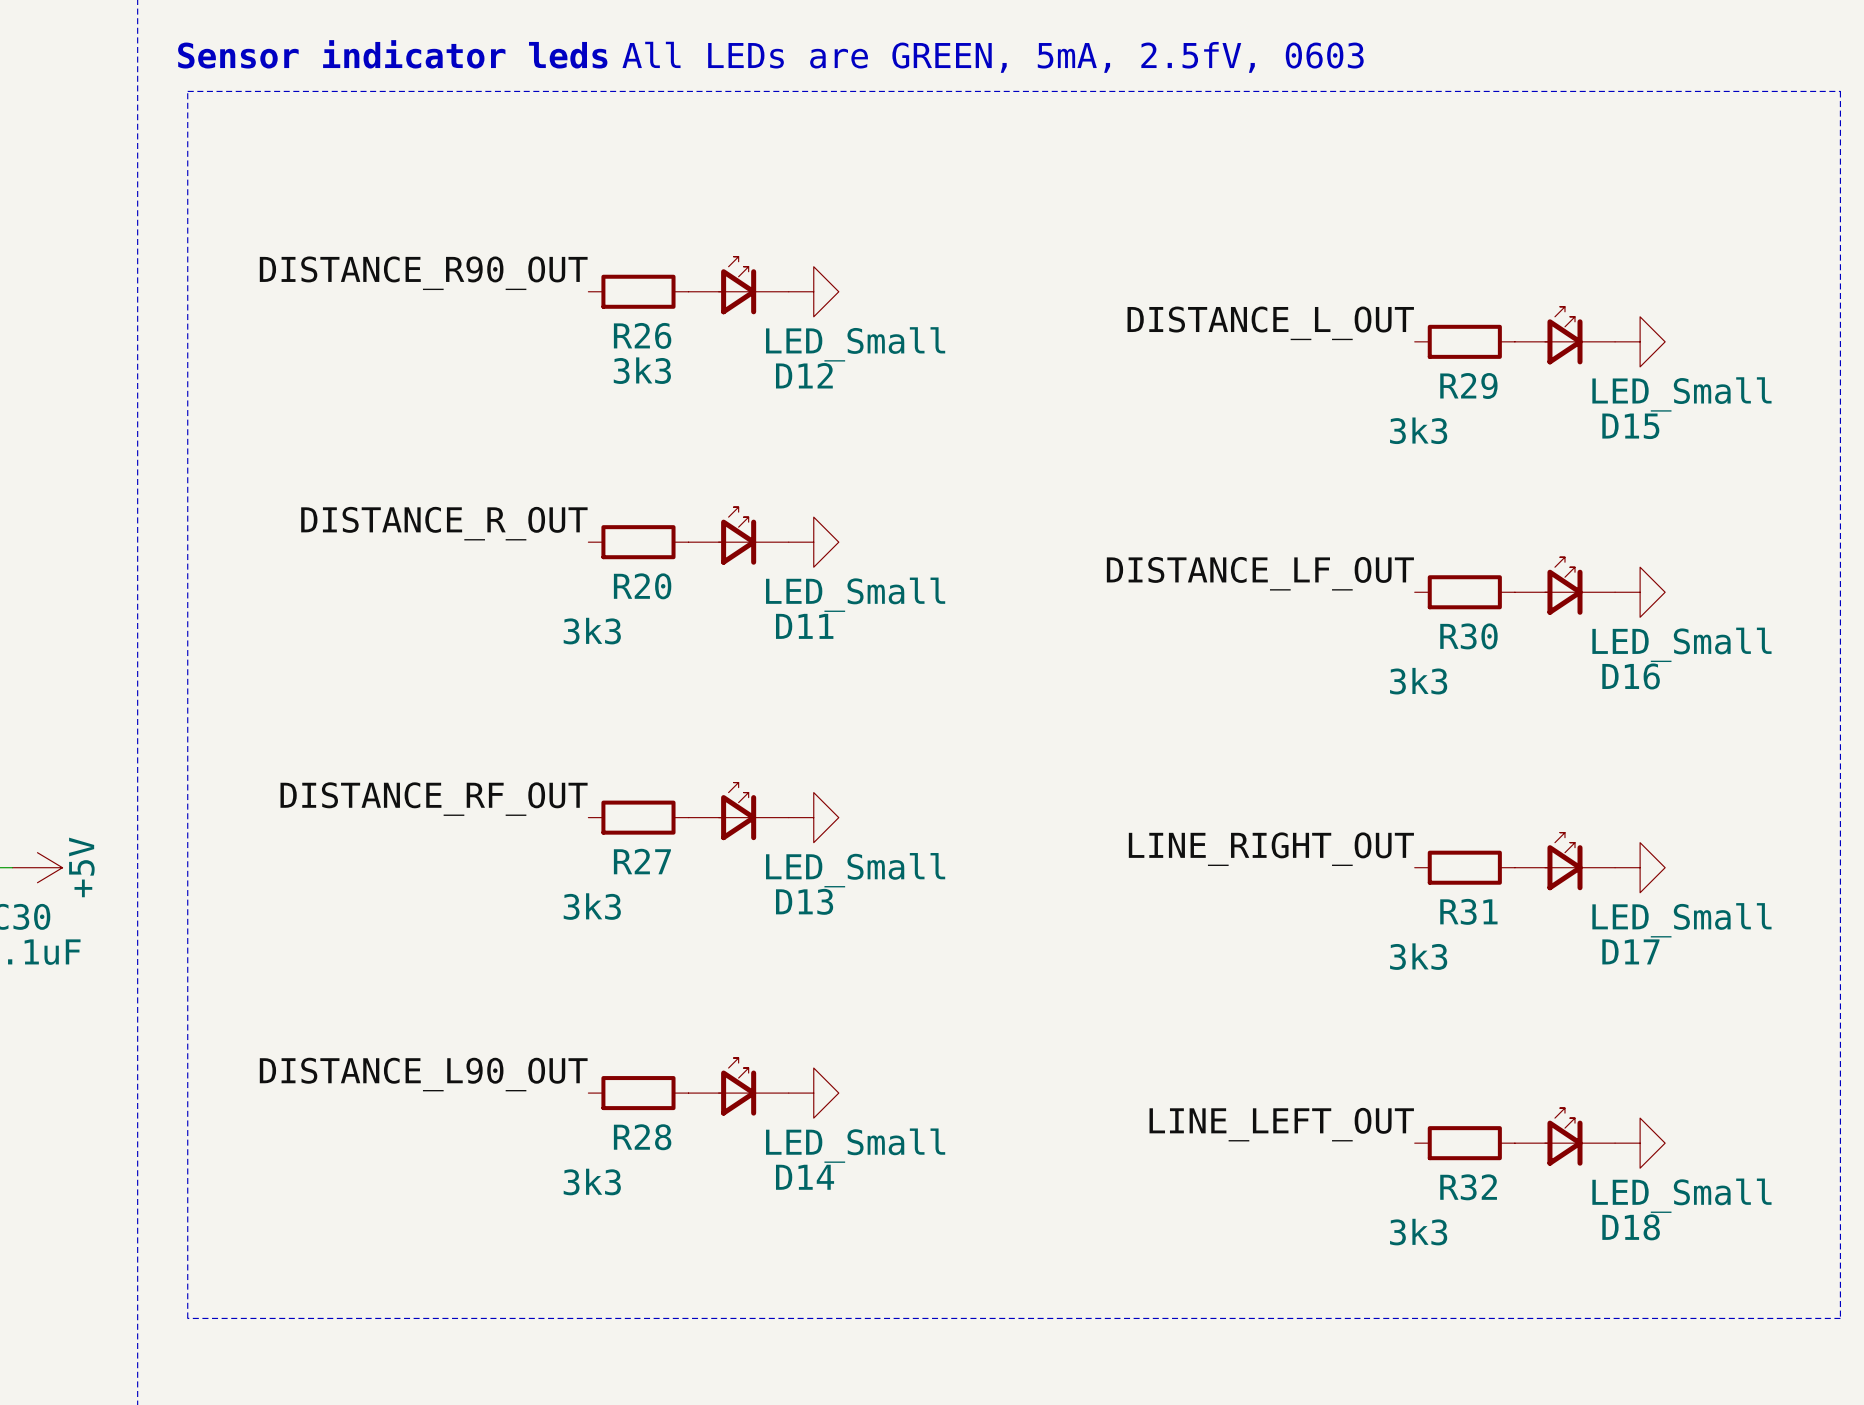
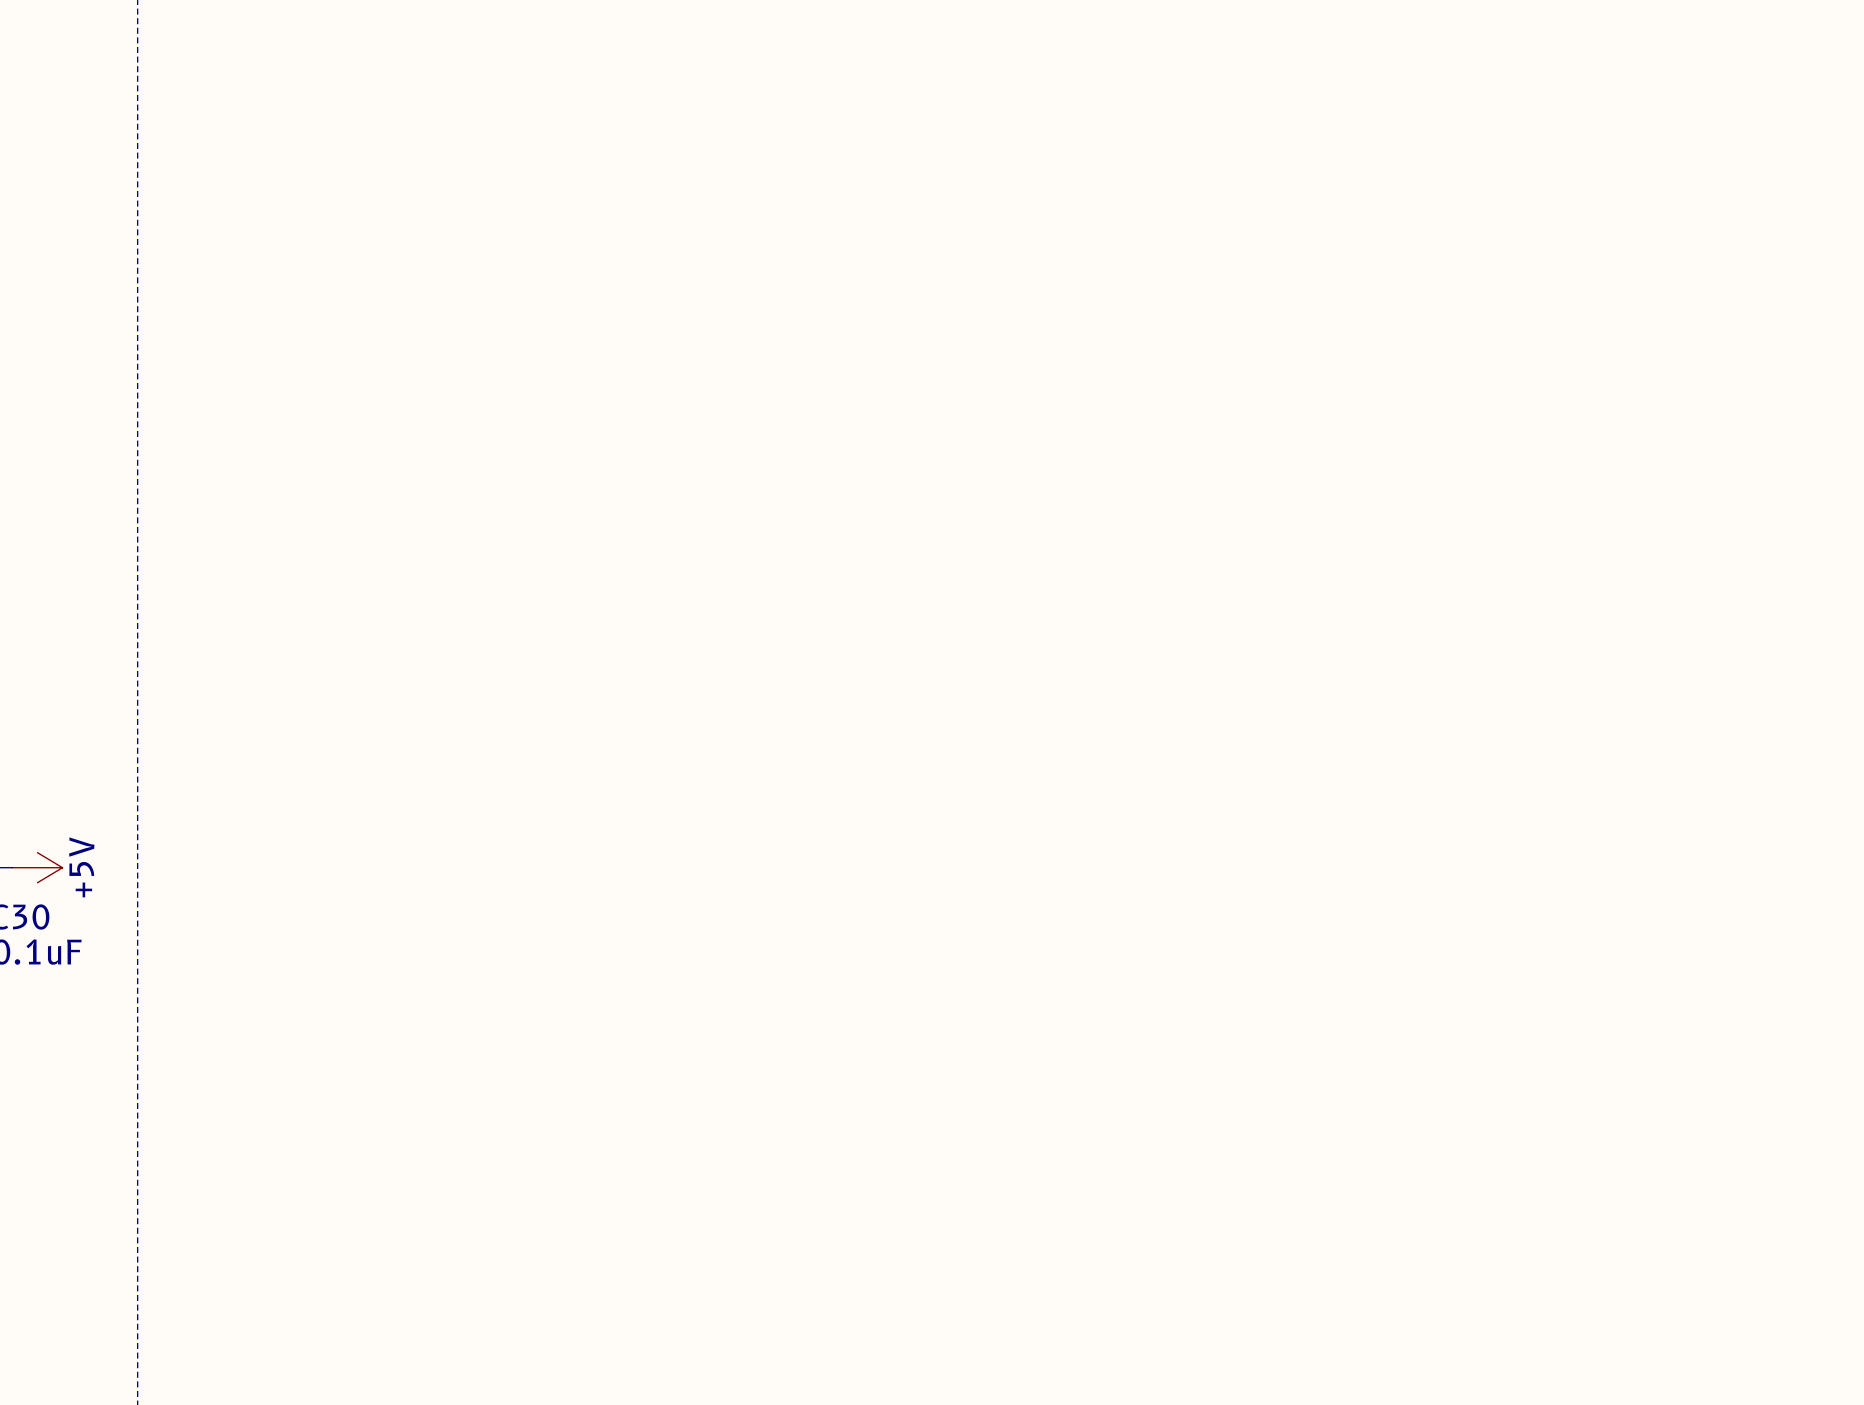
text: Sensor indicator leds (392, 54) -> none
text: All LEDs are GREEN, 5mA, 2.5fV, 0603 (993, 57) -> none
line: (187, 91) (1840, 91) (1840, 1318) (187, 1318) (187, 91) -> none
label: DISTANCE_R90_OUT (423, 273) -> none
D12: LED_Small (738, 285) -> none
R26: 3k3 (638, 291) -> none
power symbol: (813, 291) -> none
label: DISTANCE_L_OUT (1270, 323) -> none
D15: LED_Small (1564, 335) -> none
R29: 3k3 (1464, 341) -> none
power symbol: (1640, 341) -> none
label: DISTANCE_R_OUT (444, 523) -> none
D11: LED_Small (738, 535) -> none
R20: 3k3 (638, 542) -> none
power symbol: (813, 542) -> none
label: DISTANCE_LF_OUT (1260, 573) -> none
D16: LED_Small (1564, 585) -> none
R30: 3k3 (1464, 592) -> none
power symbol: (1640, 592) -> none
label: DISTANCE_RF_OUT (434, 799) -> none
D13: LED_Small (738, 811) -> none
R27: 3k3 (638, 817) -> none
power symbol: (813, 817) -> none
label: LINE_RIGHT_OUT (1271, 849) -> none
D17: LED_Small (1564, 861) -> none
R31: 3k3 (1464, 867) -> none
power symbol: (1640, 867) -> none
label: DISTANCE_L90_OUT (423, 1074) -> none
D14: LED_Small (738, 1086) -> none
R28: 3k3 (638, 1093) -> none
power symbol: (813, 1093) -> none
label: LINE_LEFT_OUT (1281, 1124) -> none
D18: LED_Small (1564, 1136) -> none
R32: 3k3 (1464, 1143) -> none
power symbol: (1640, 1143) -> none

